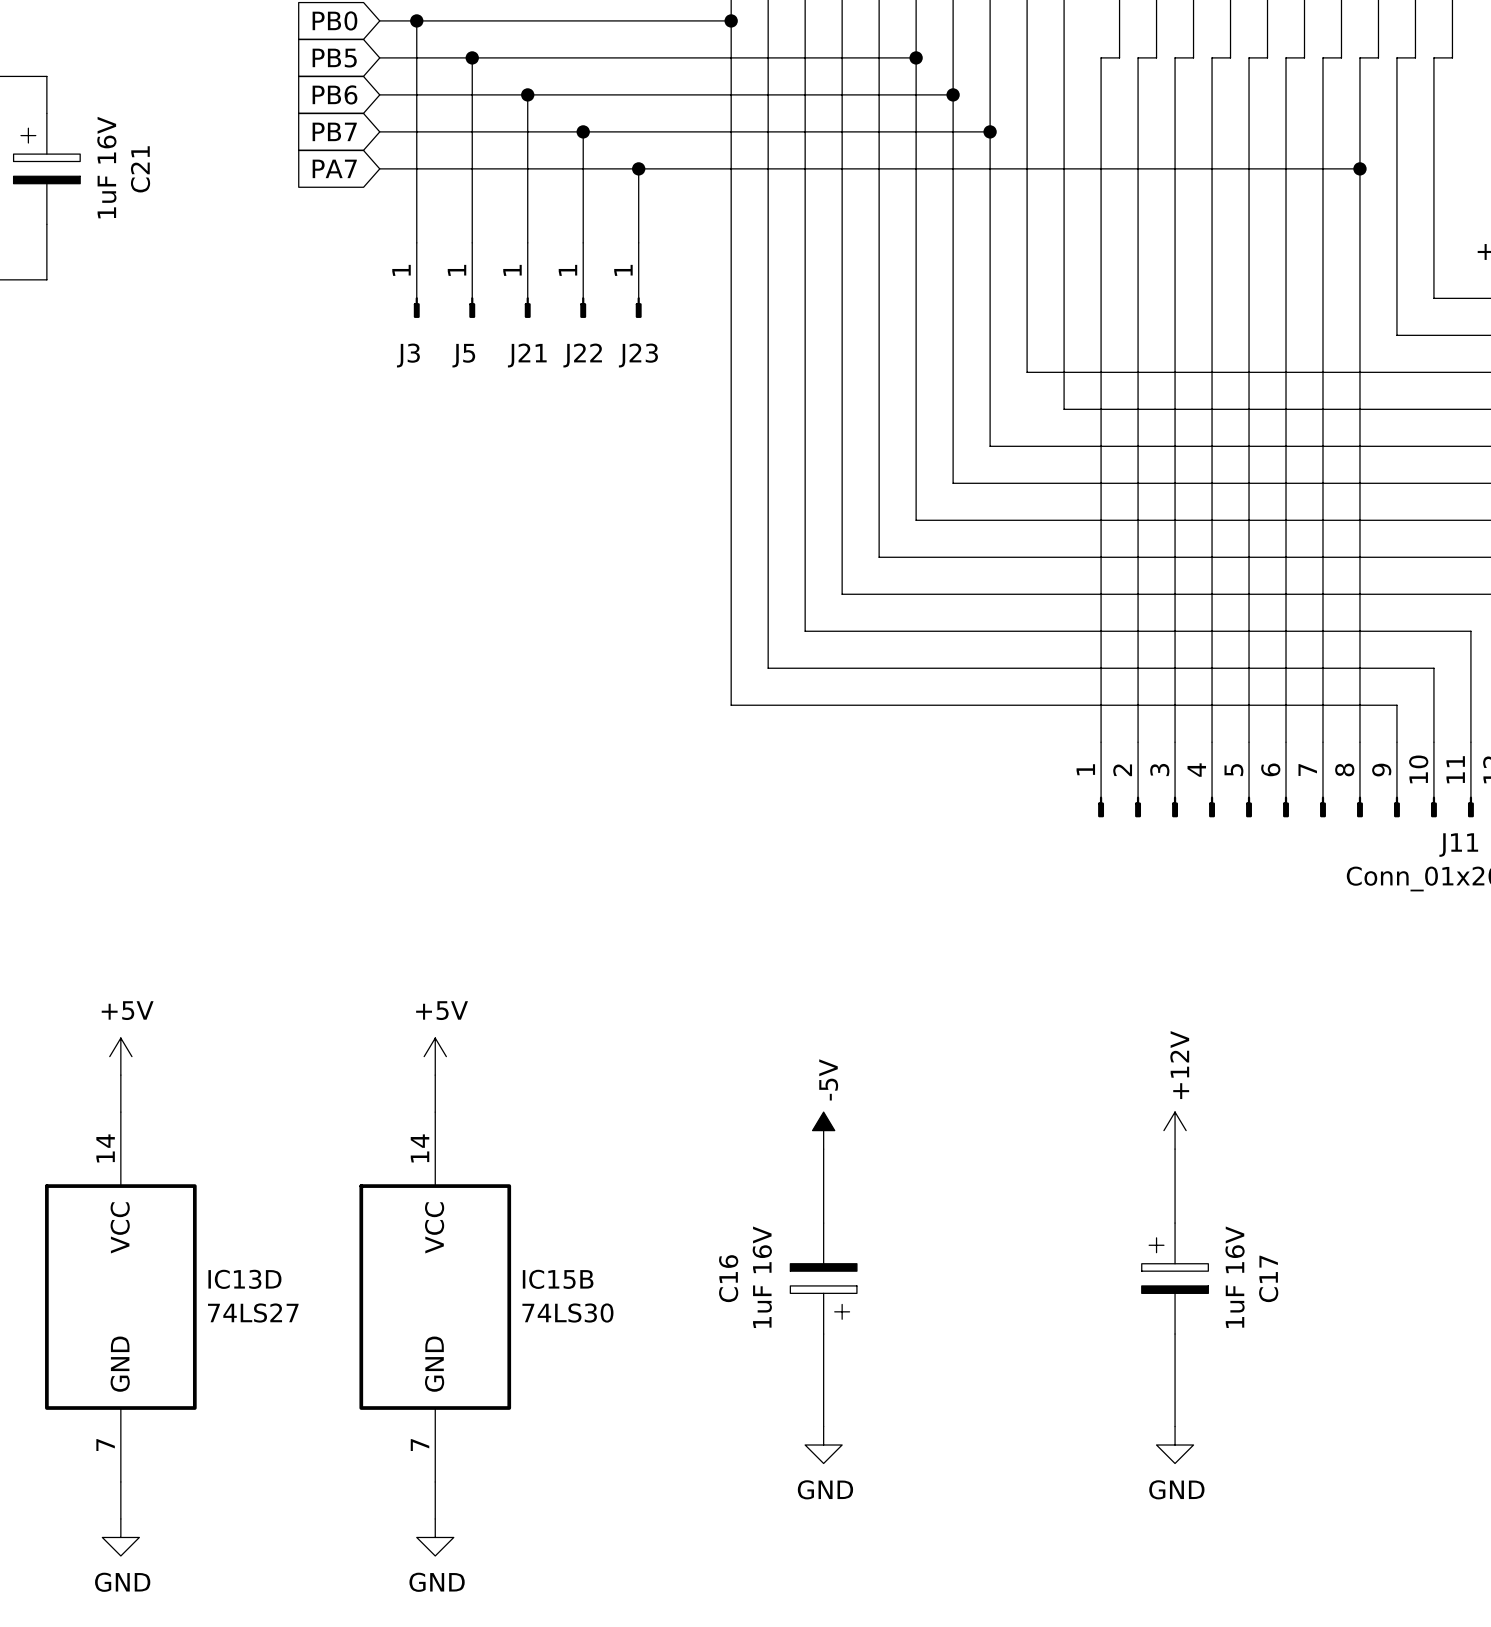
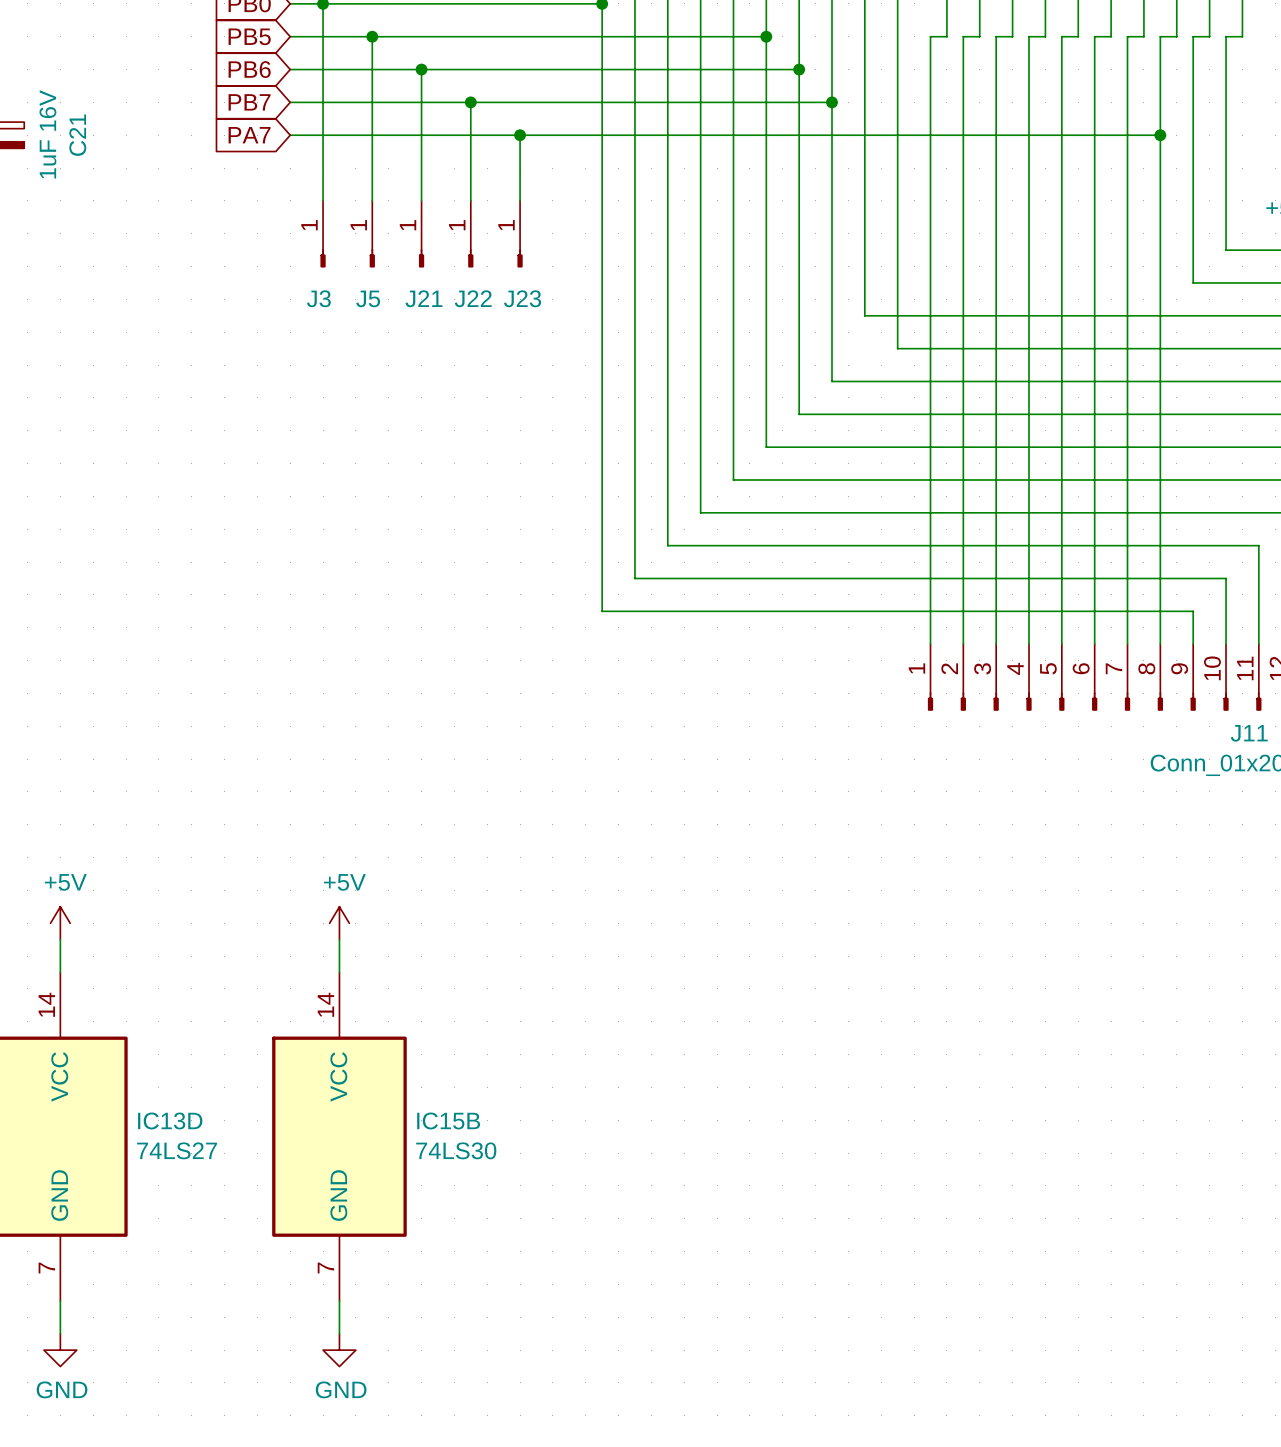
power symbol: -5V (823, 1130) -> none
power symbol: +12V (1175, 1130) -> none
wire: (823, 1149) (823, 1223) -> none
wire: (1175, 1149) (1175, 1223) -> none
C16: 1uF 16V (823, 1278) -> none
C17: 1uF 16V (1175, 1278) -> none
wire: (823, 1334) (823, 1426) -> none
wire: (1175, 1334) (1175, 1426) -> none
power symbol: GND (823, 1445) -> none
power symbol: GND (1175, 1445) -> none

